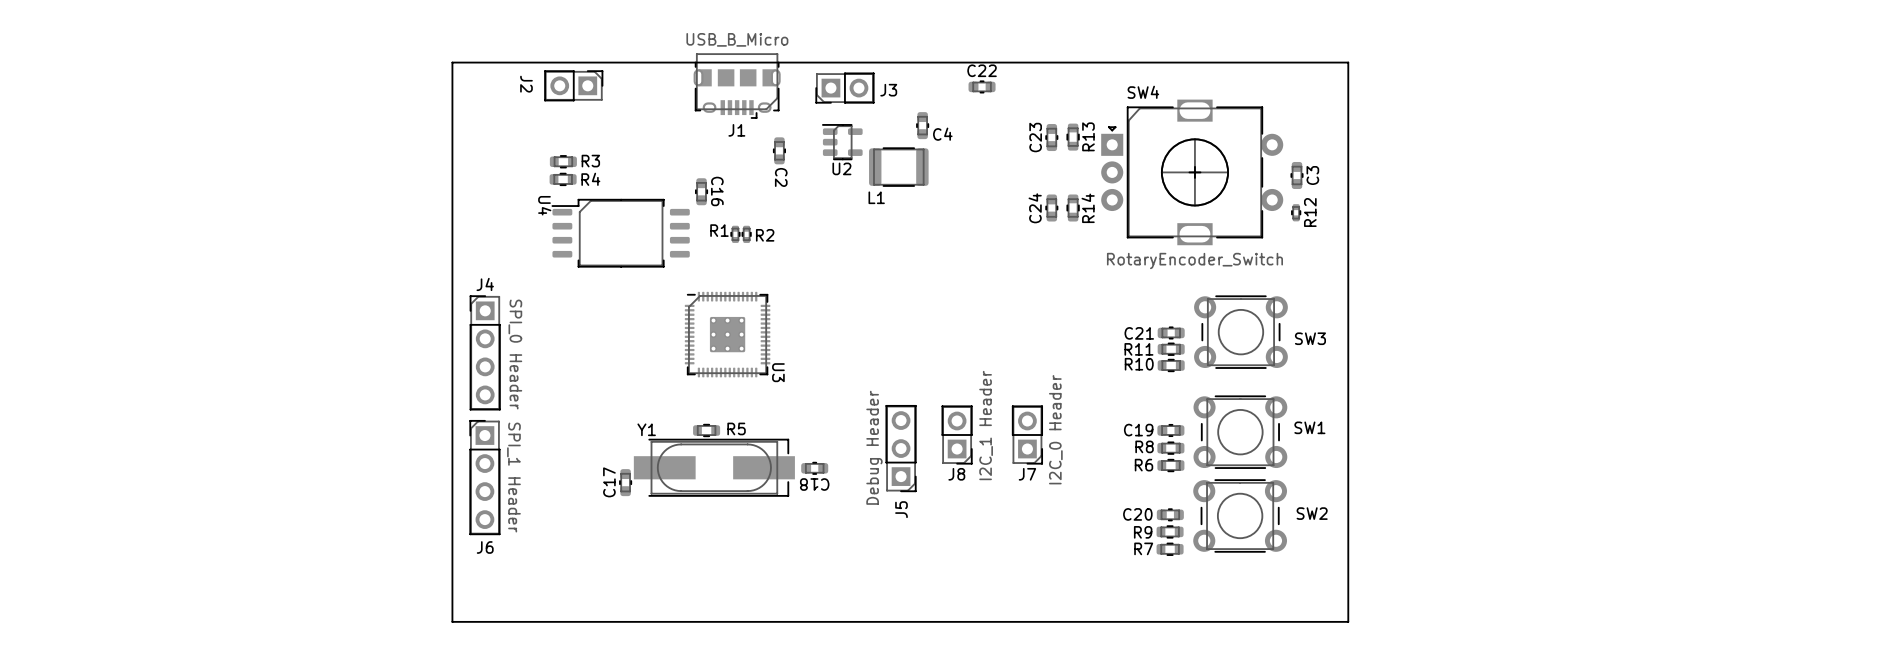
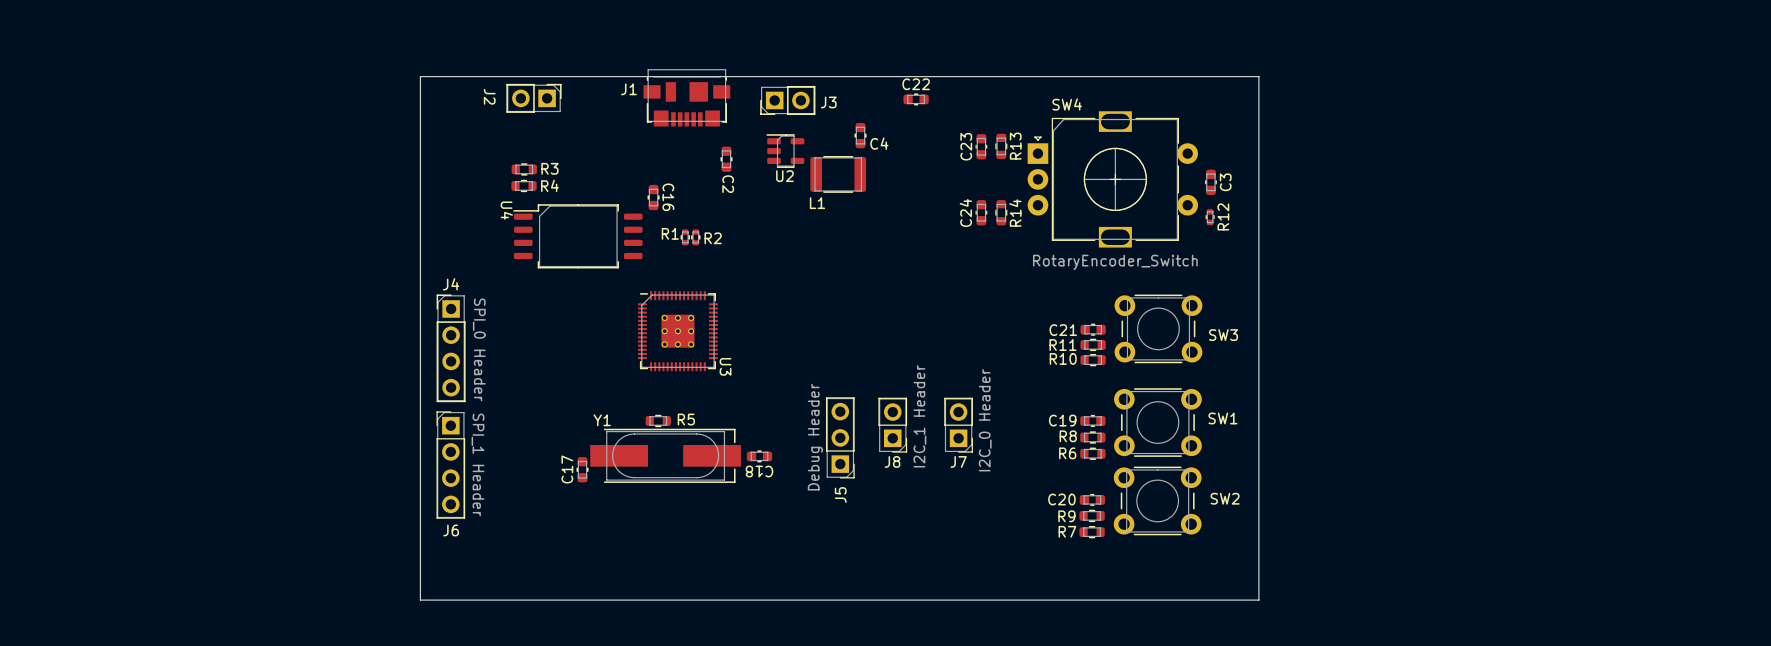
J1 value: USB_B_Micro (737, 39) -> none
J1 footprint: [693, 53, 781, 119] -> [643, 69, 731, 127]
J1 name position: J1 (736, 130) -> J1 (628, 89)

